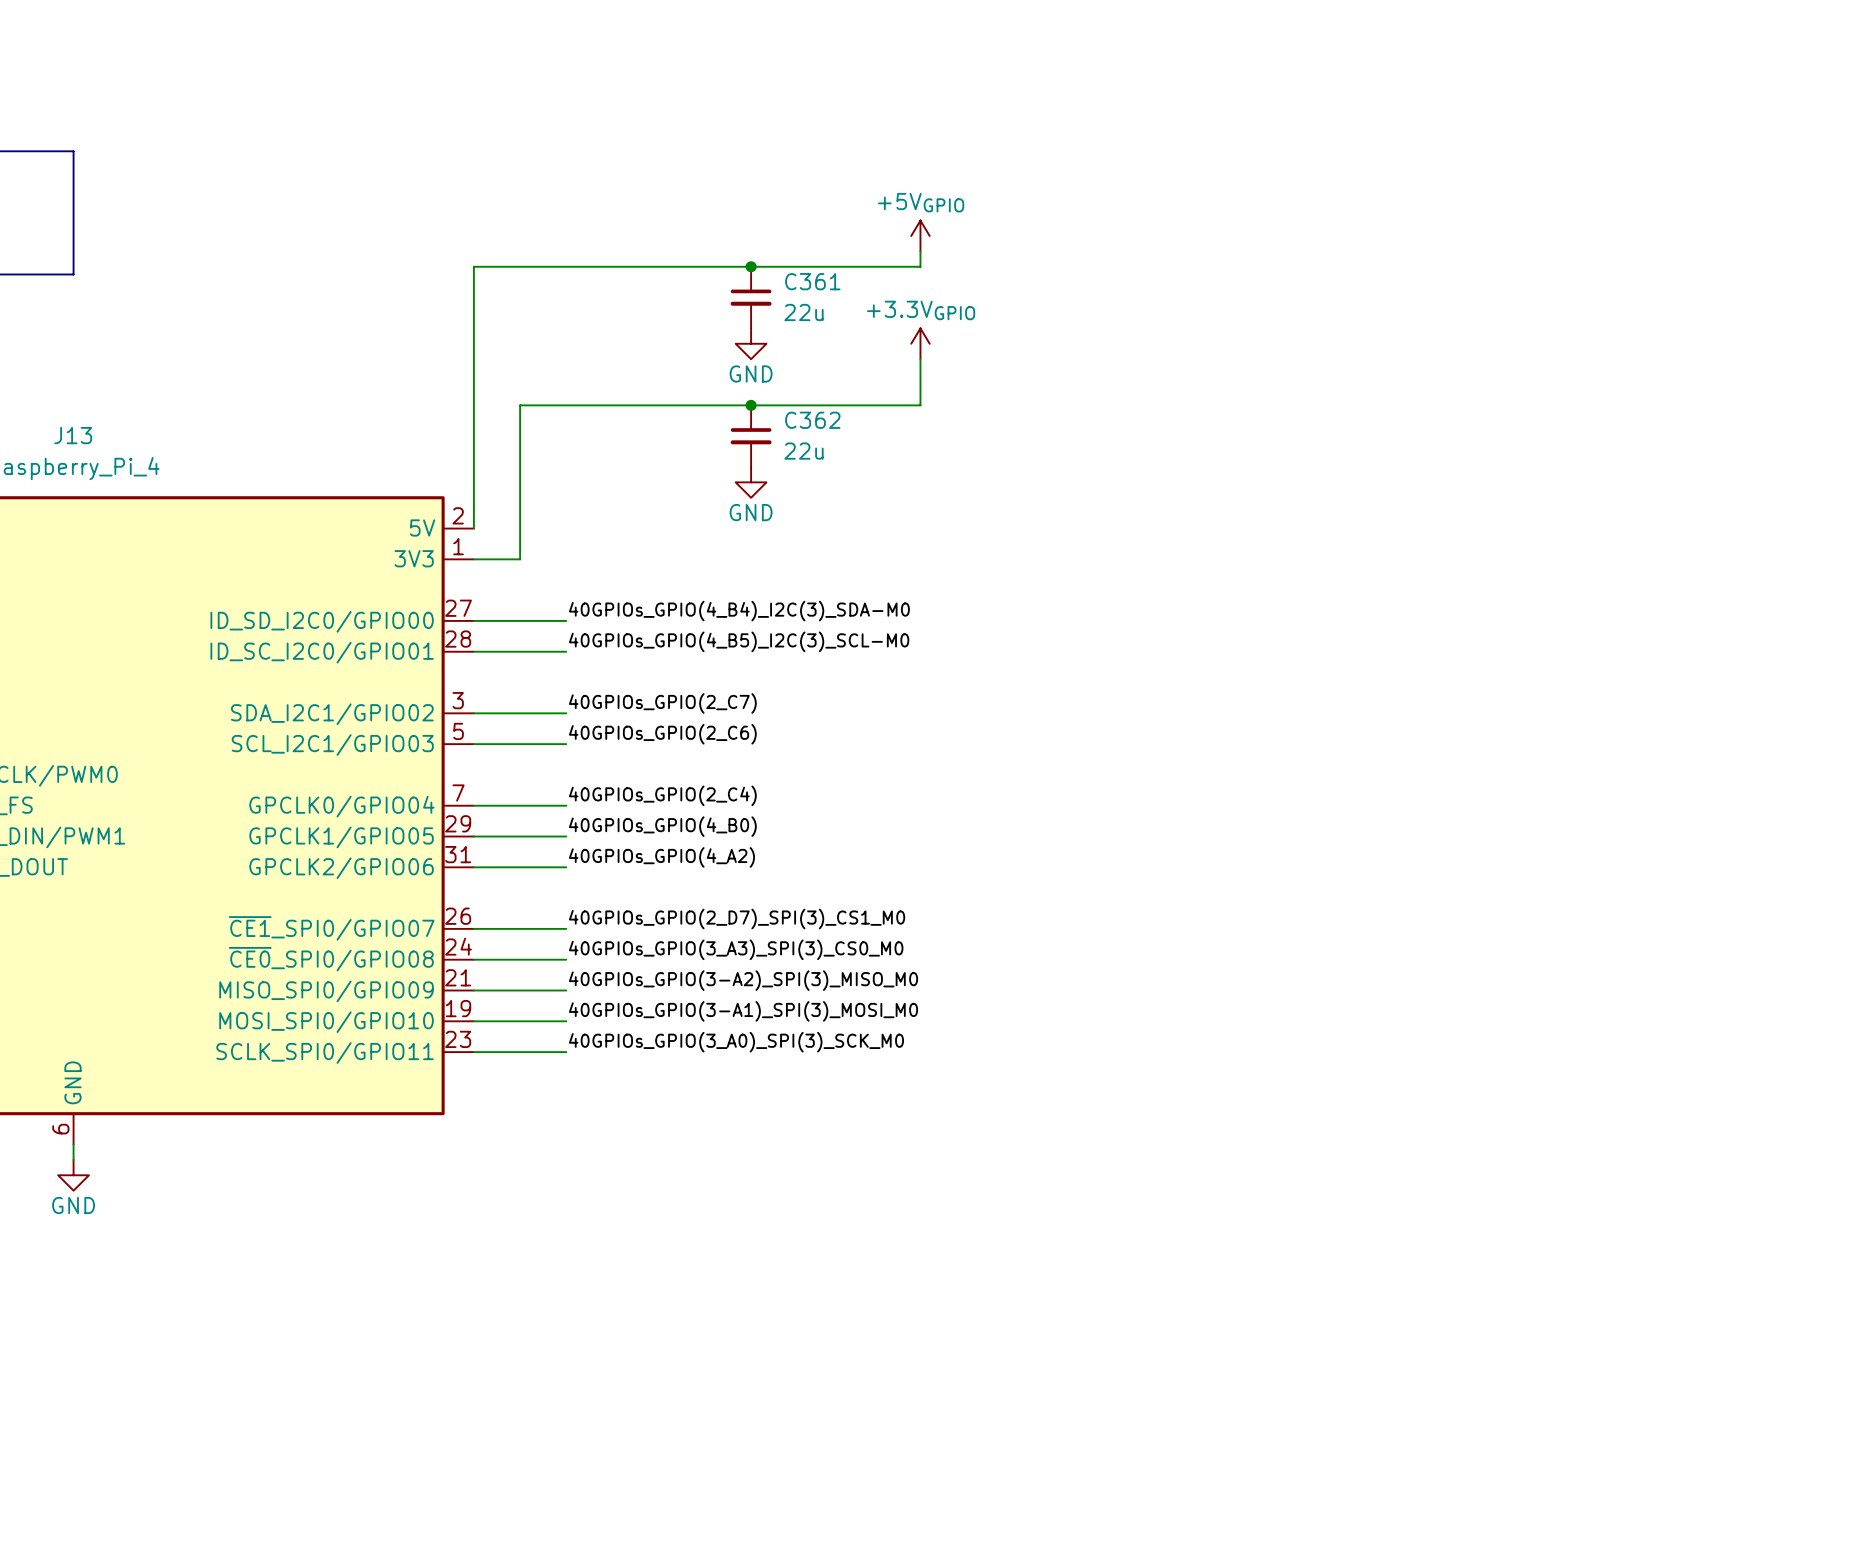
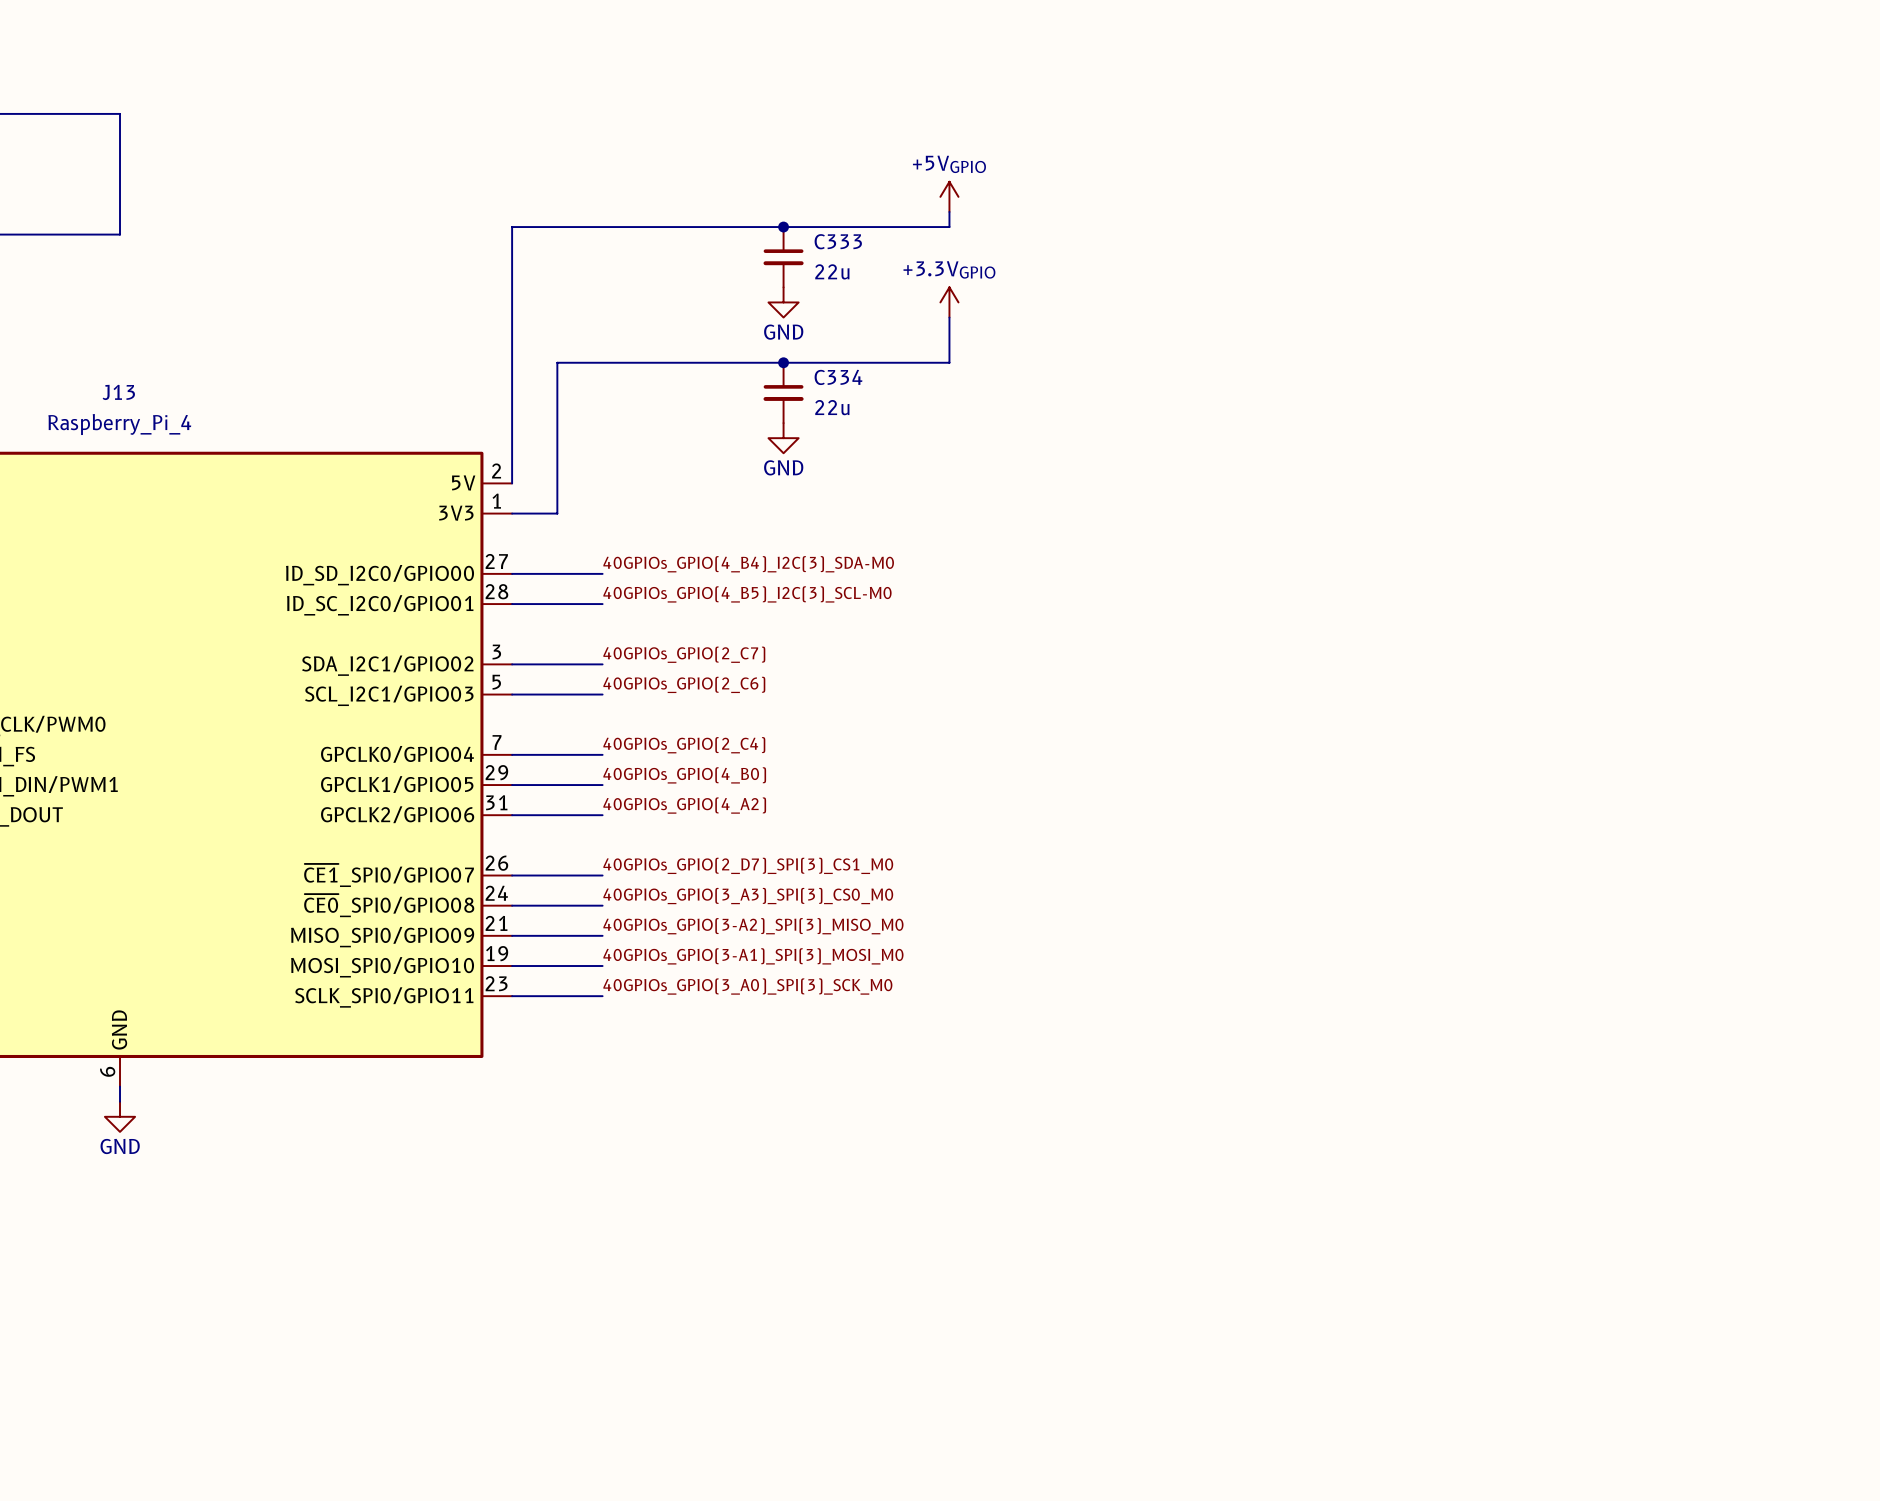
C361 name: C361 (812, 281) -> C333 (838, 241)
C362 name: C362 (812, 420) -> C334 (838, 377)

